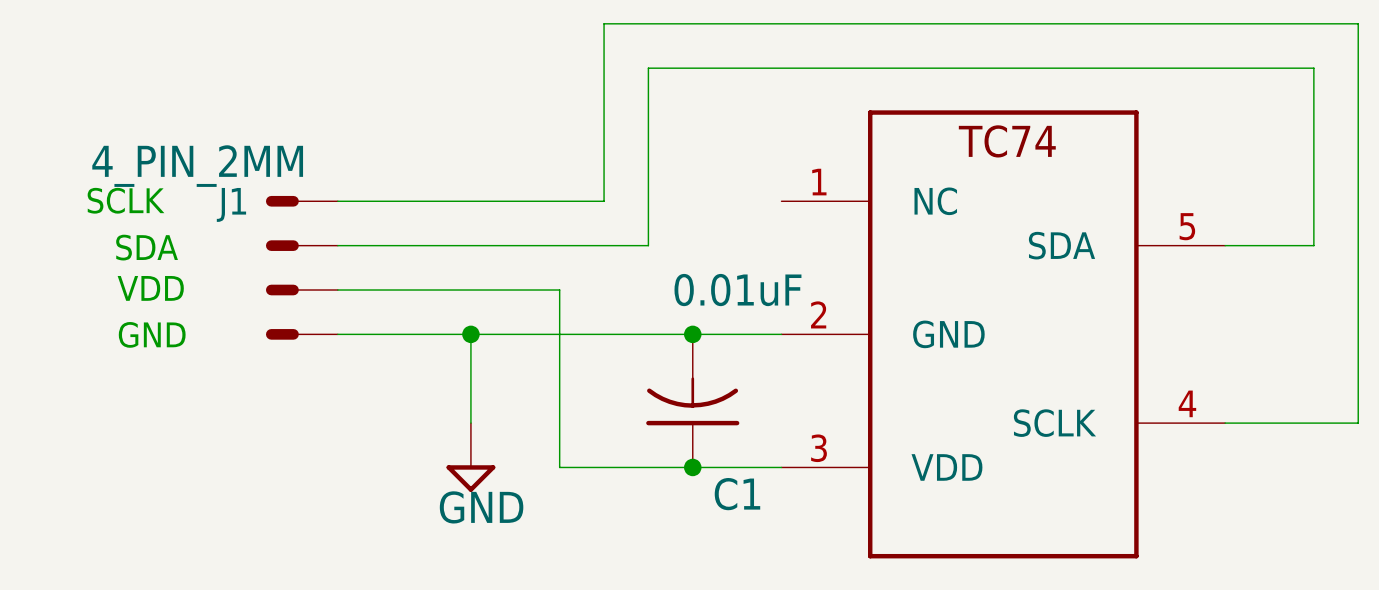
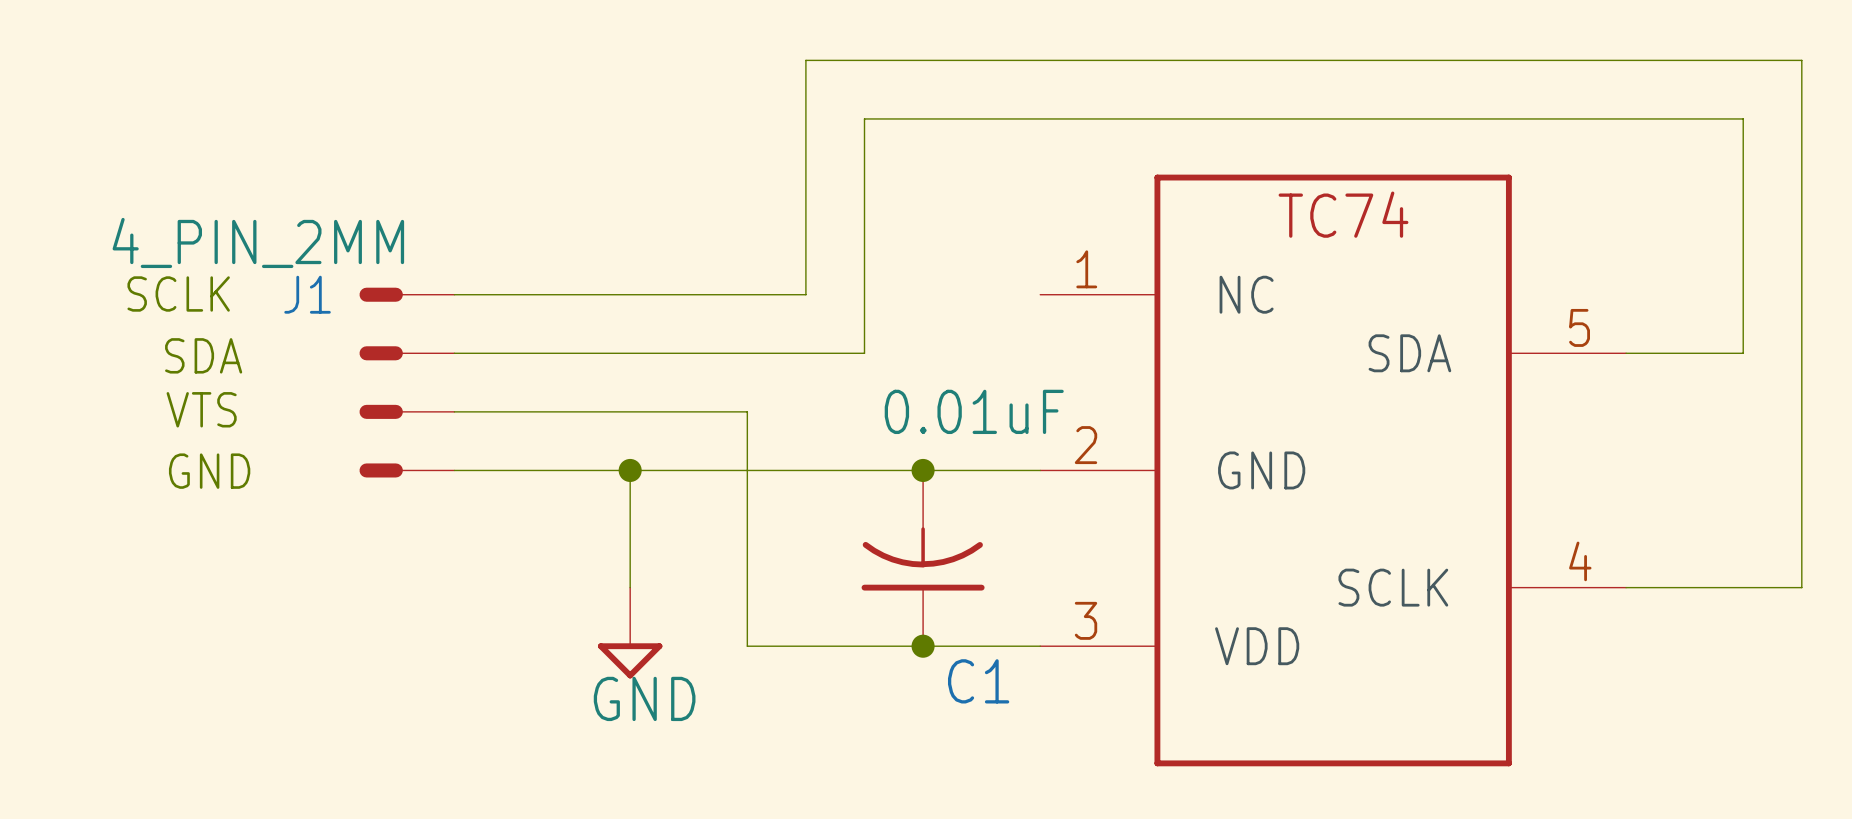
text: VDD (150, 288) -> VTS (201, 409)

